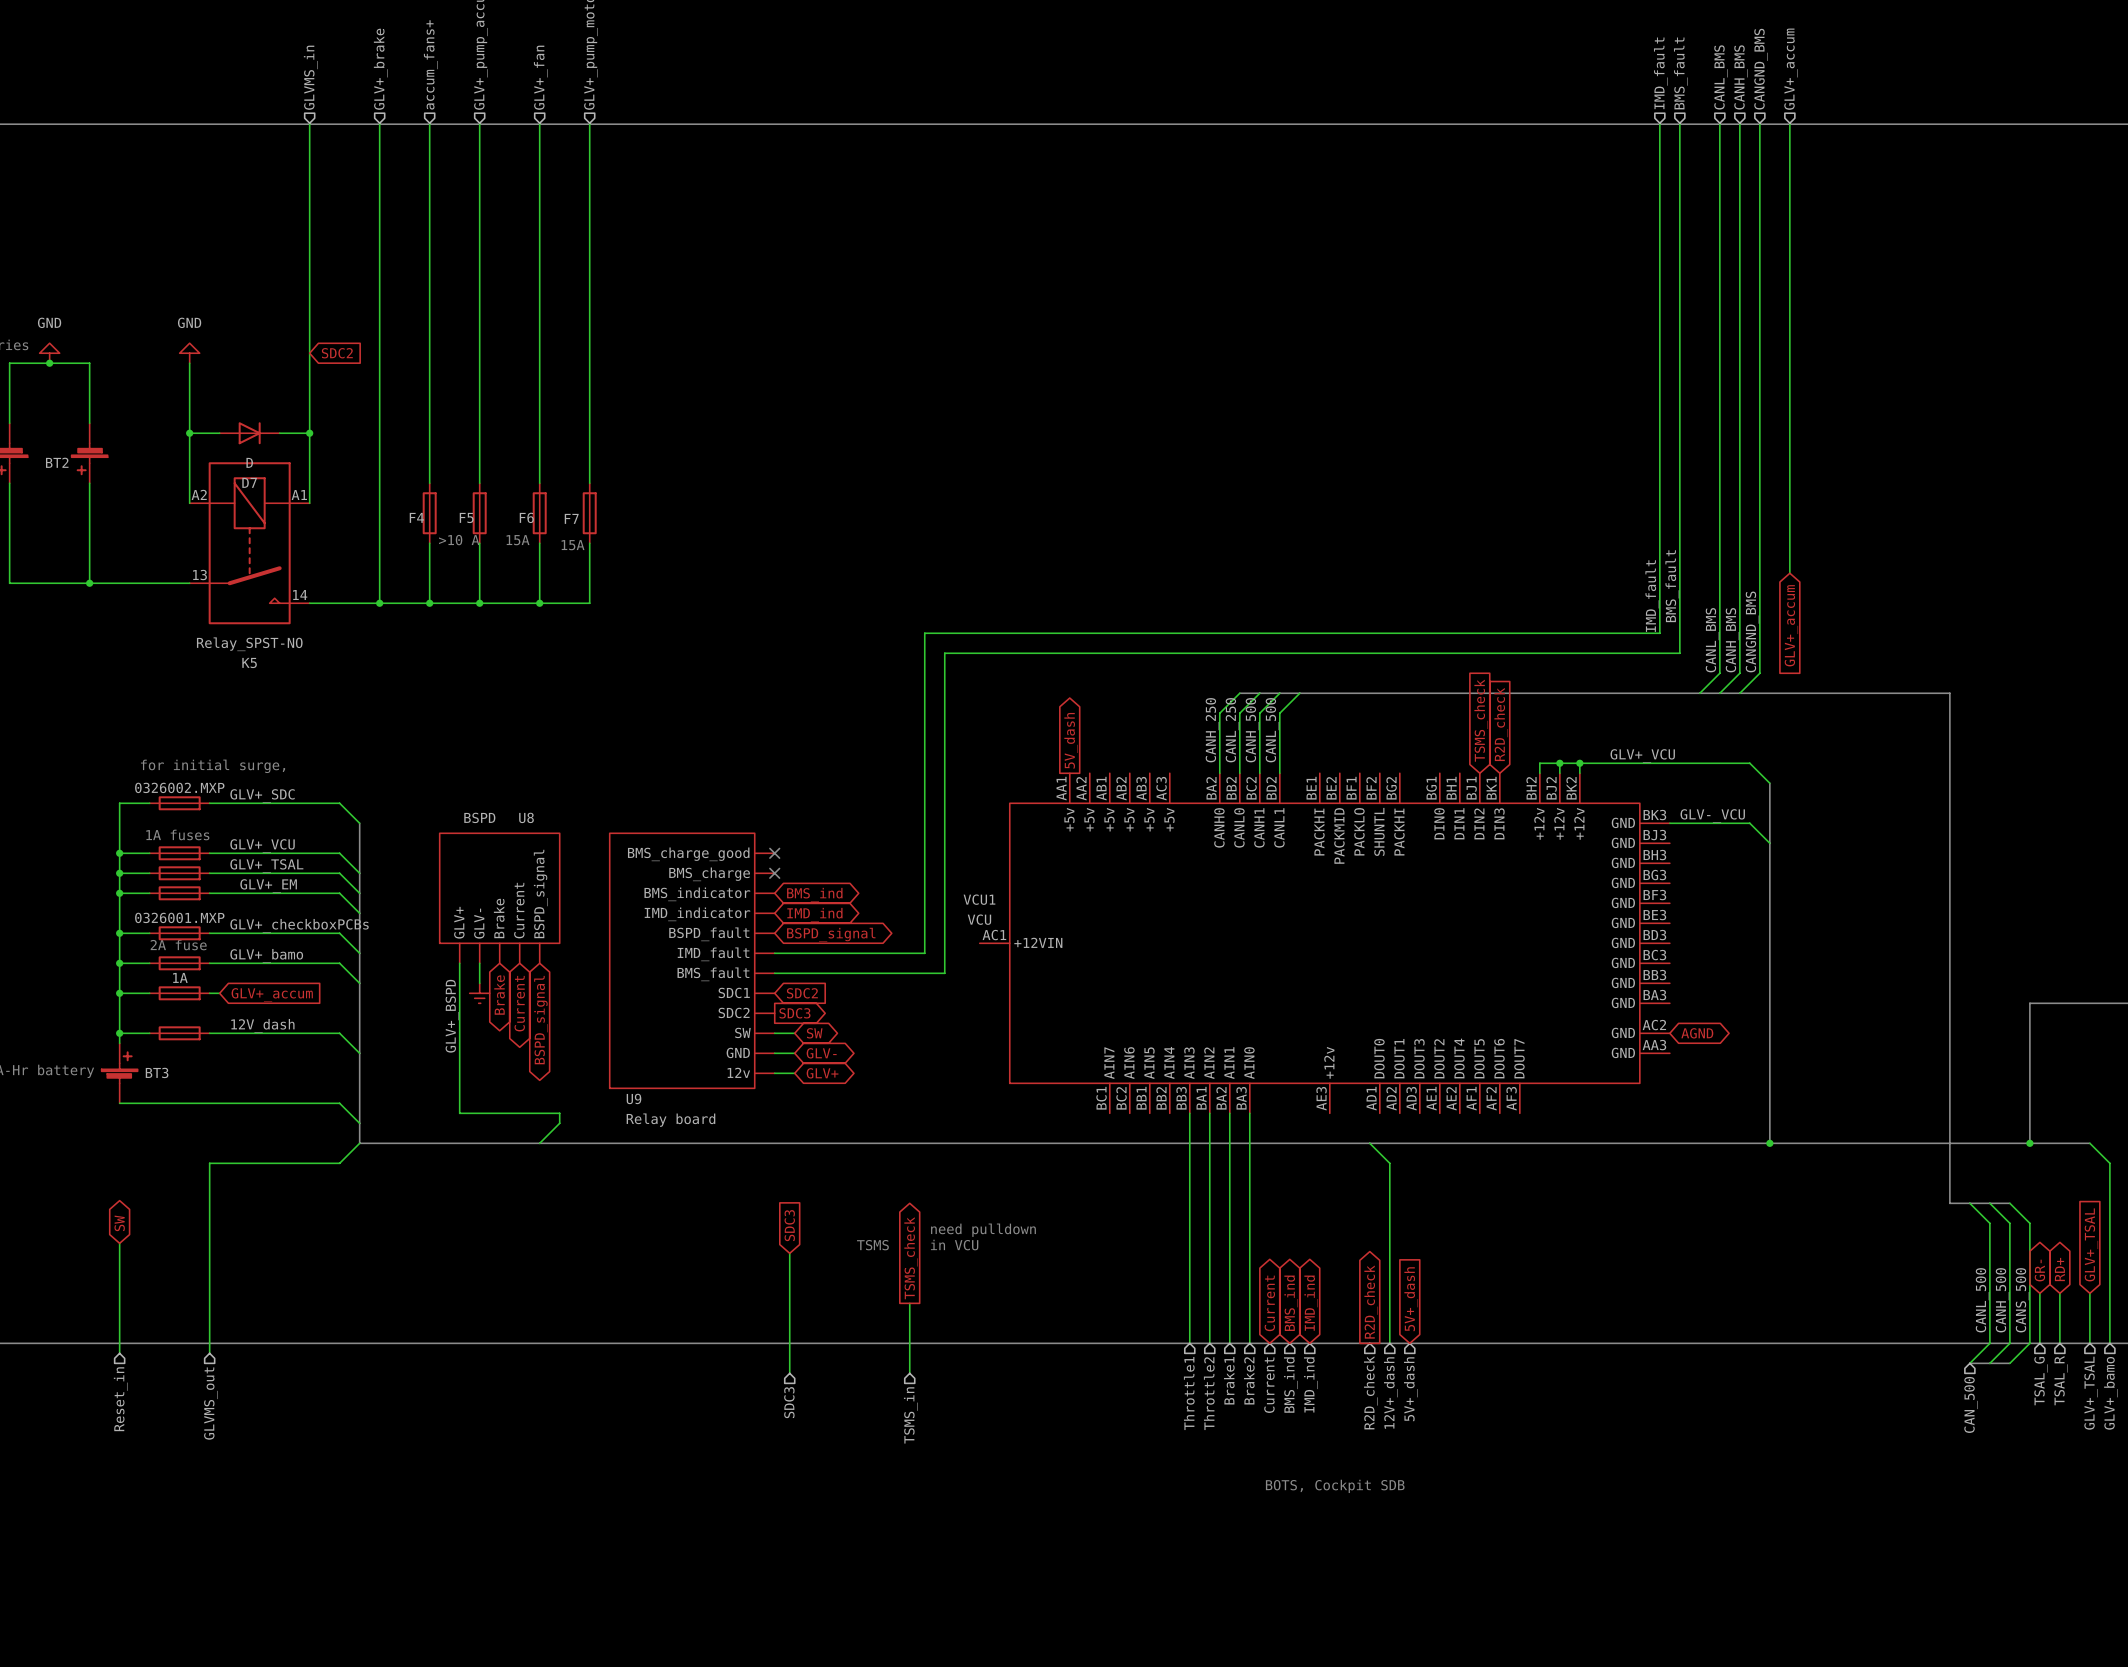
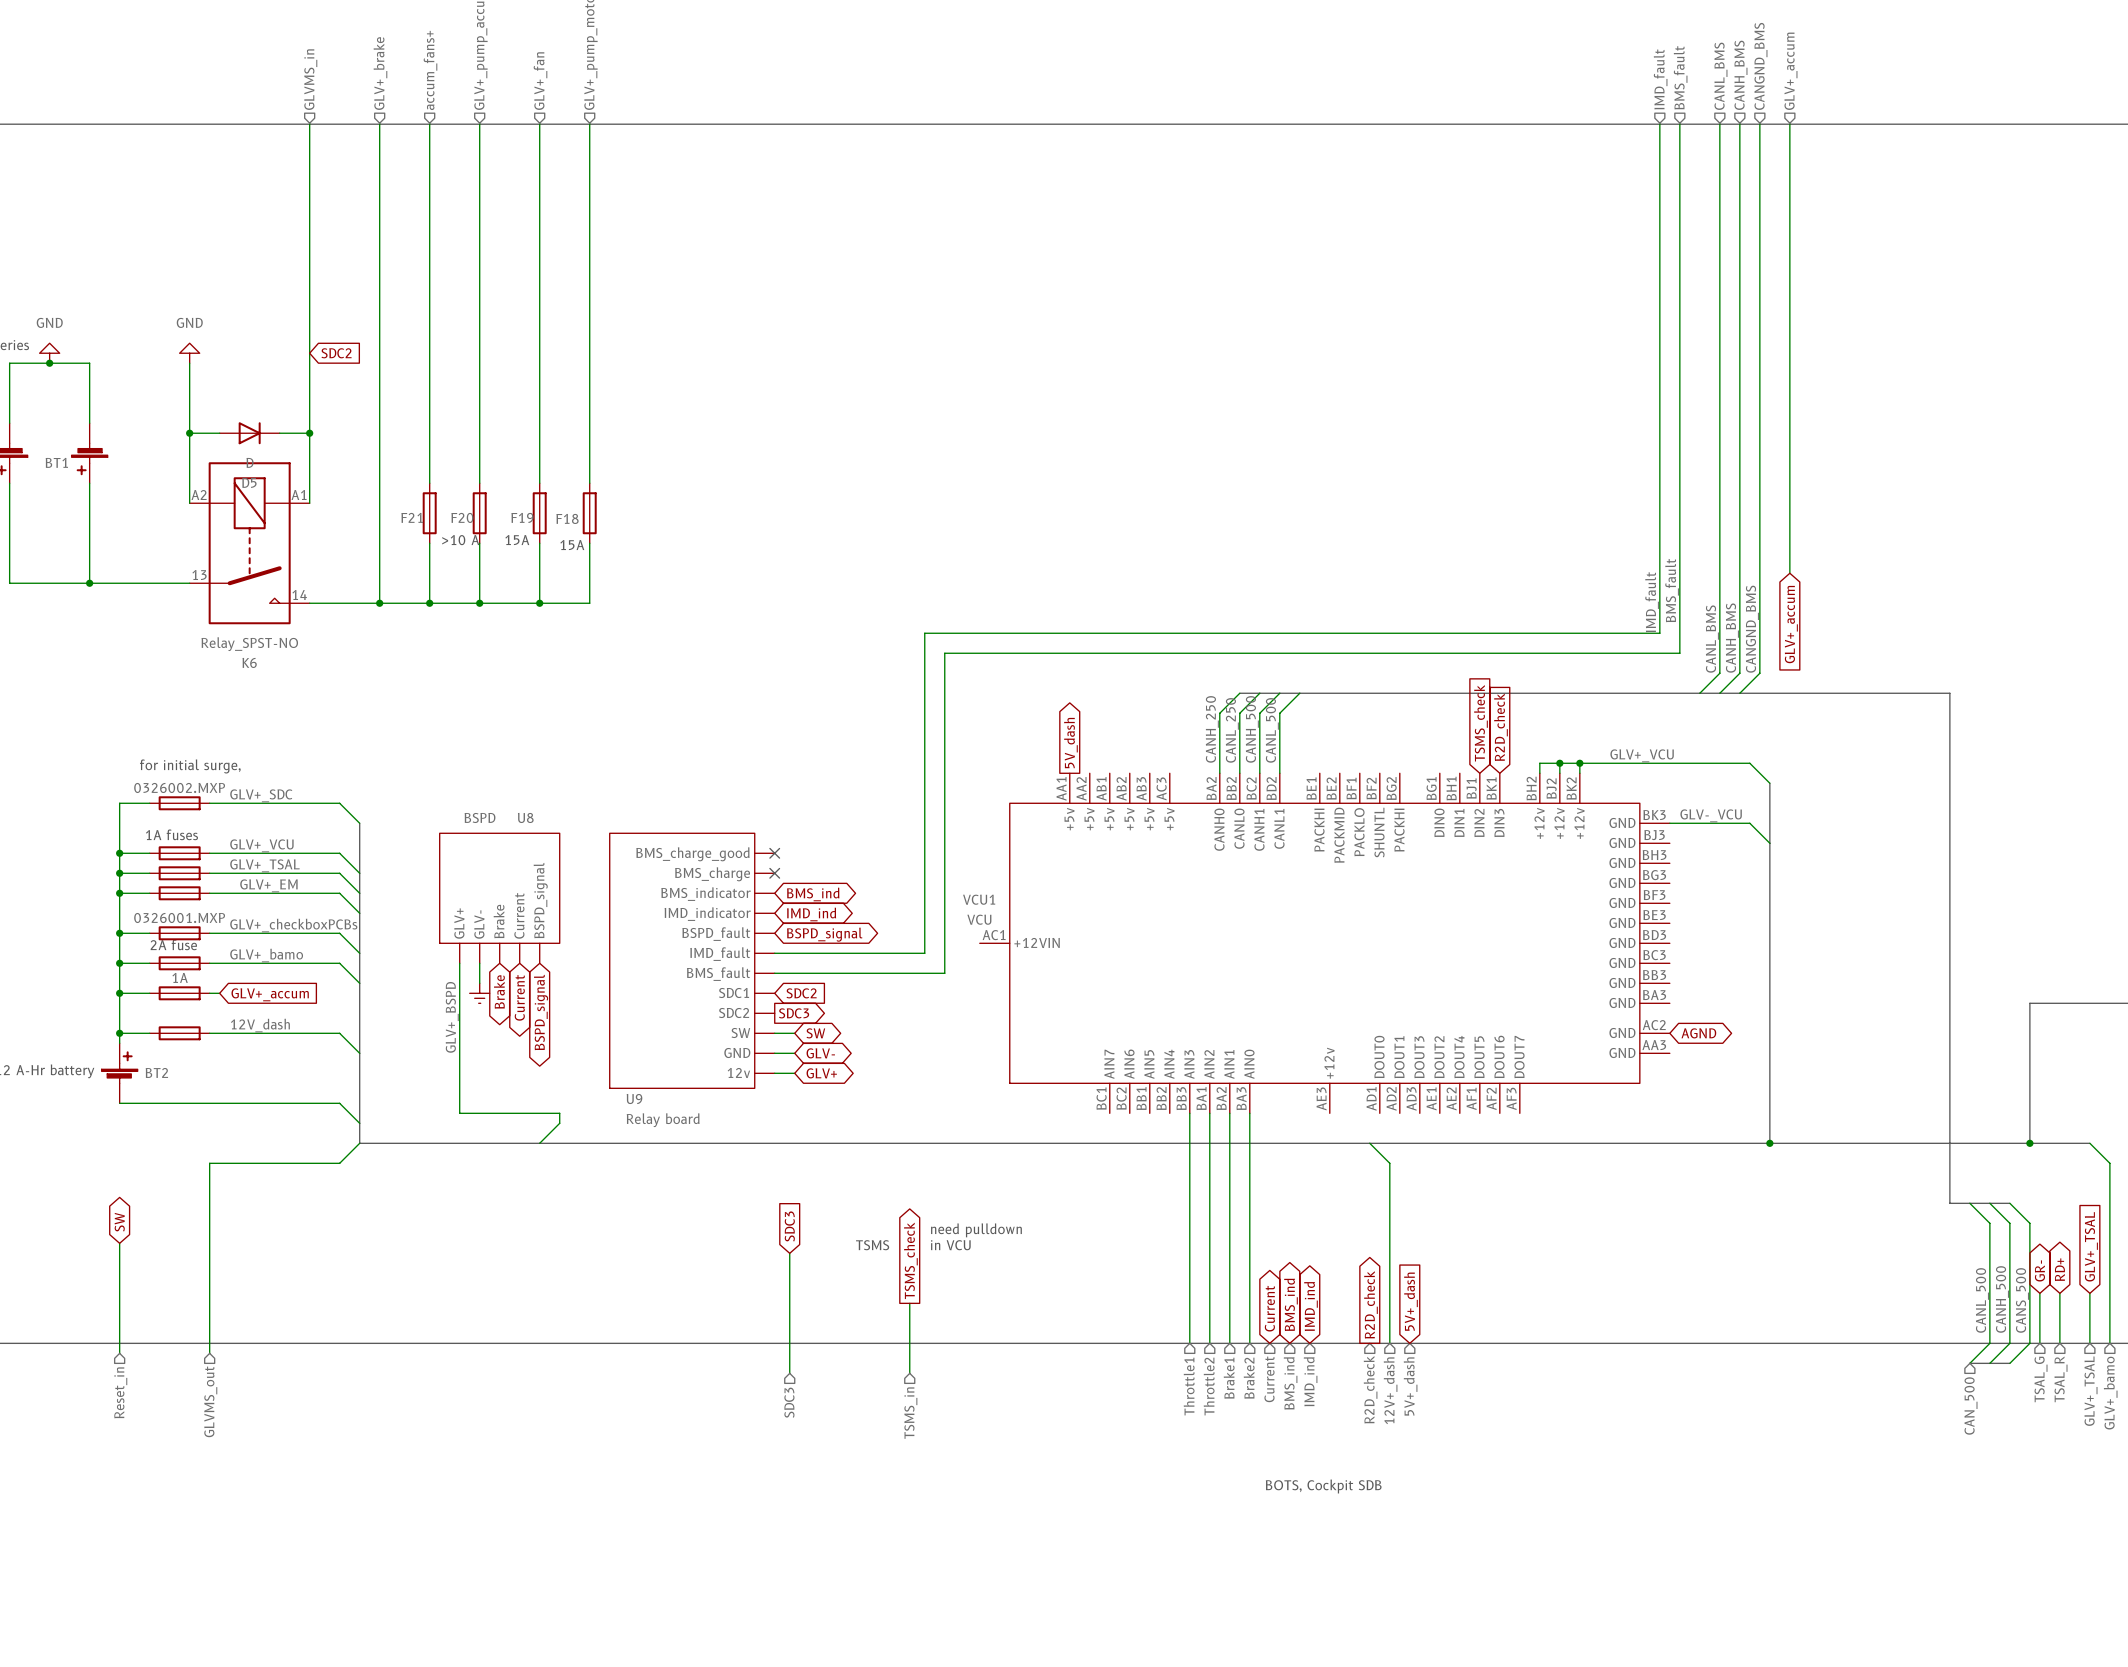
BT2 name: BT2 (57, 462) -> BT1 (56, 462)
D7 name: D7 (249, 482) -> D5 (249, 482)
F4 name: F4 (416, 517) -> F21 (412, 517)
F5 name: F5 (466, 517) -> F20 (462, 517)
F6 name: F6 (526, 517) -> F19 (522, 517)
F7 name: F7 (571, 518) -> F18 (567, 518)
K5 name: K5 (249, 662) -> K6 (249, 662)
BT3 name: BT3 (157, 1072) -> BT2 (156, 1072)

